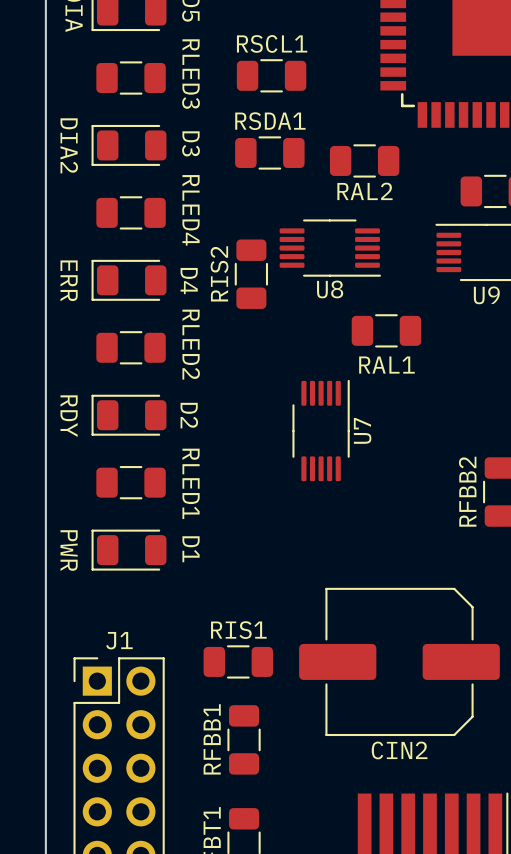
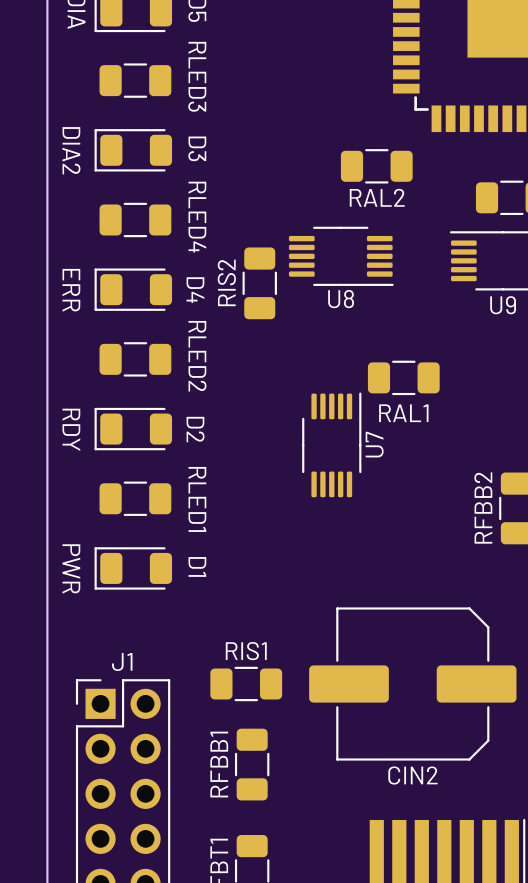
RSCL1: (271, 75) -> none
RSDA1: (269, 152) -> none
RAL1 position: (386, 330) -> (403, 377)

